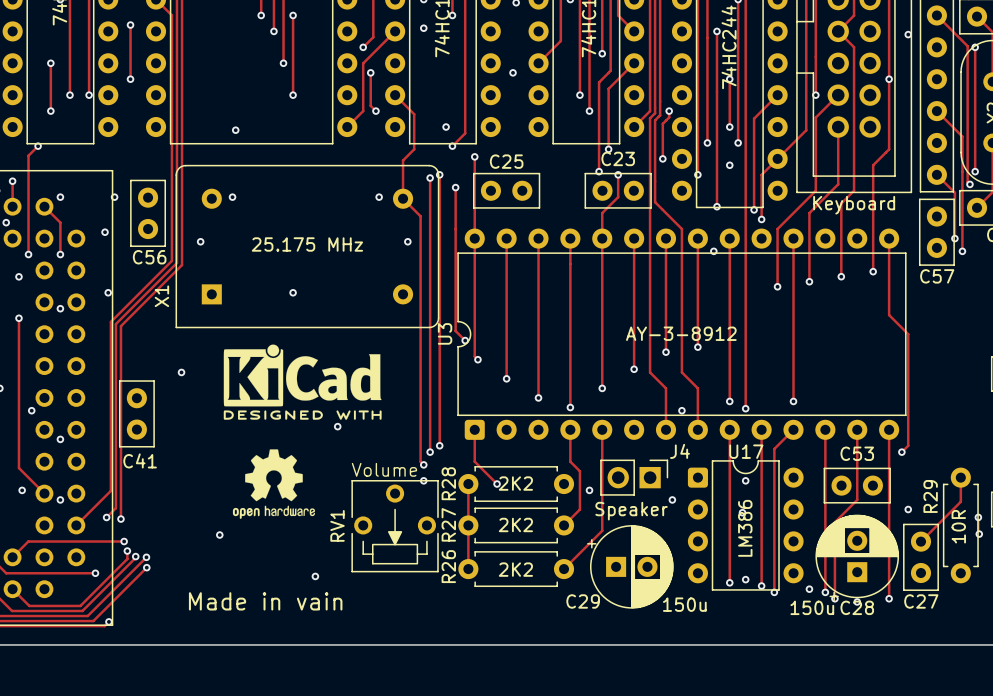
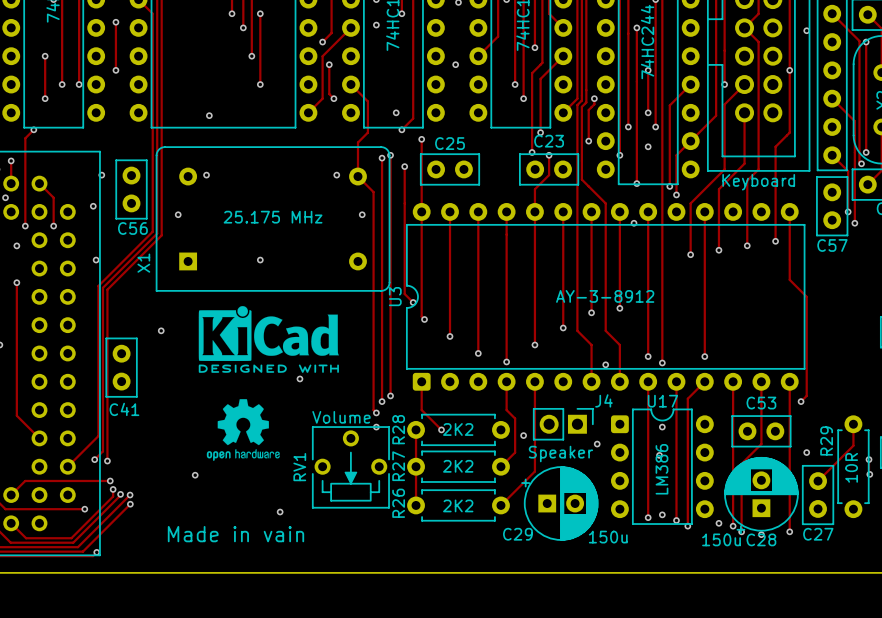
via: (60, 197) -> none
via: (60, 308) -> none
via: (31, 410) -> none
via: (60, 439) -> none
via: (22, 490) -> none
via: (60, 499) -> none

